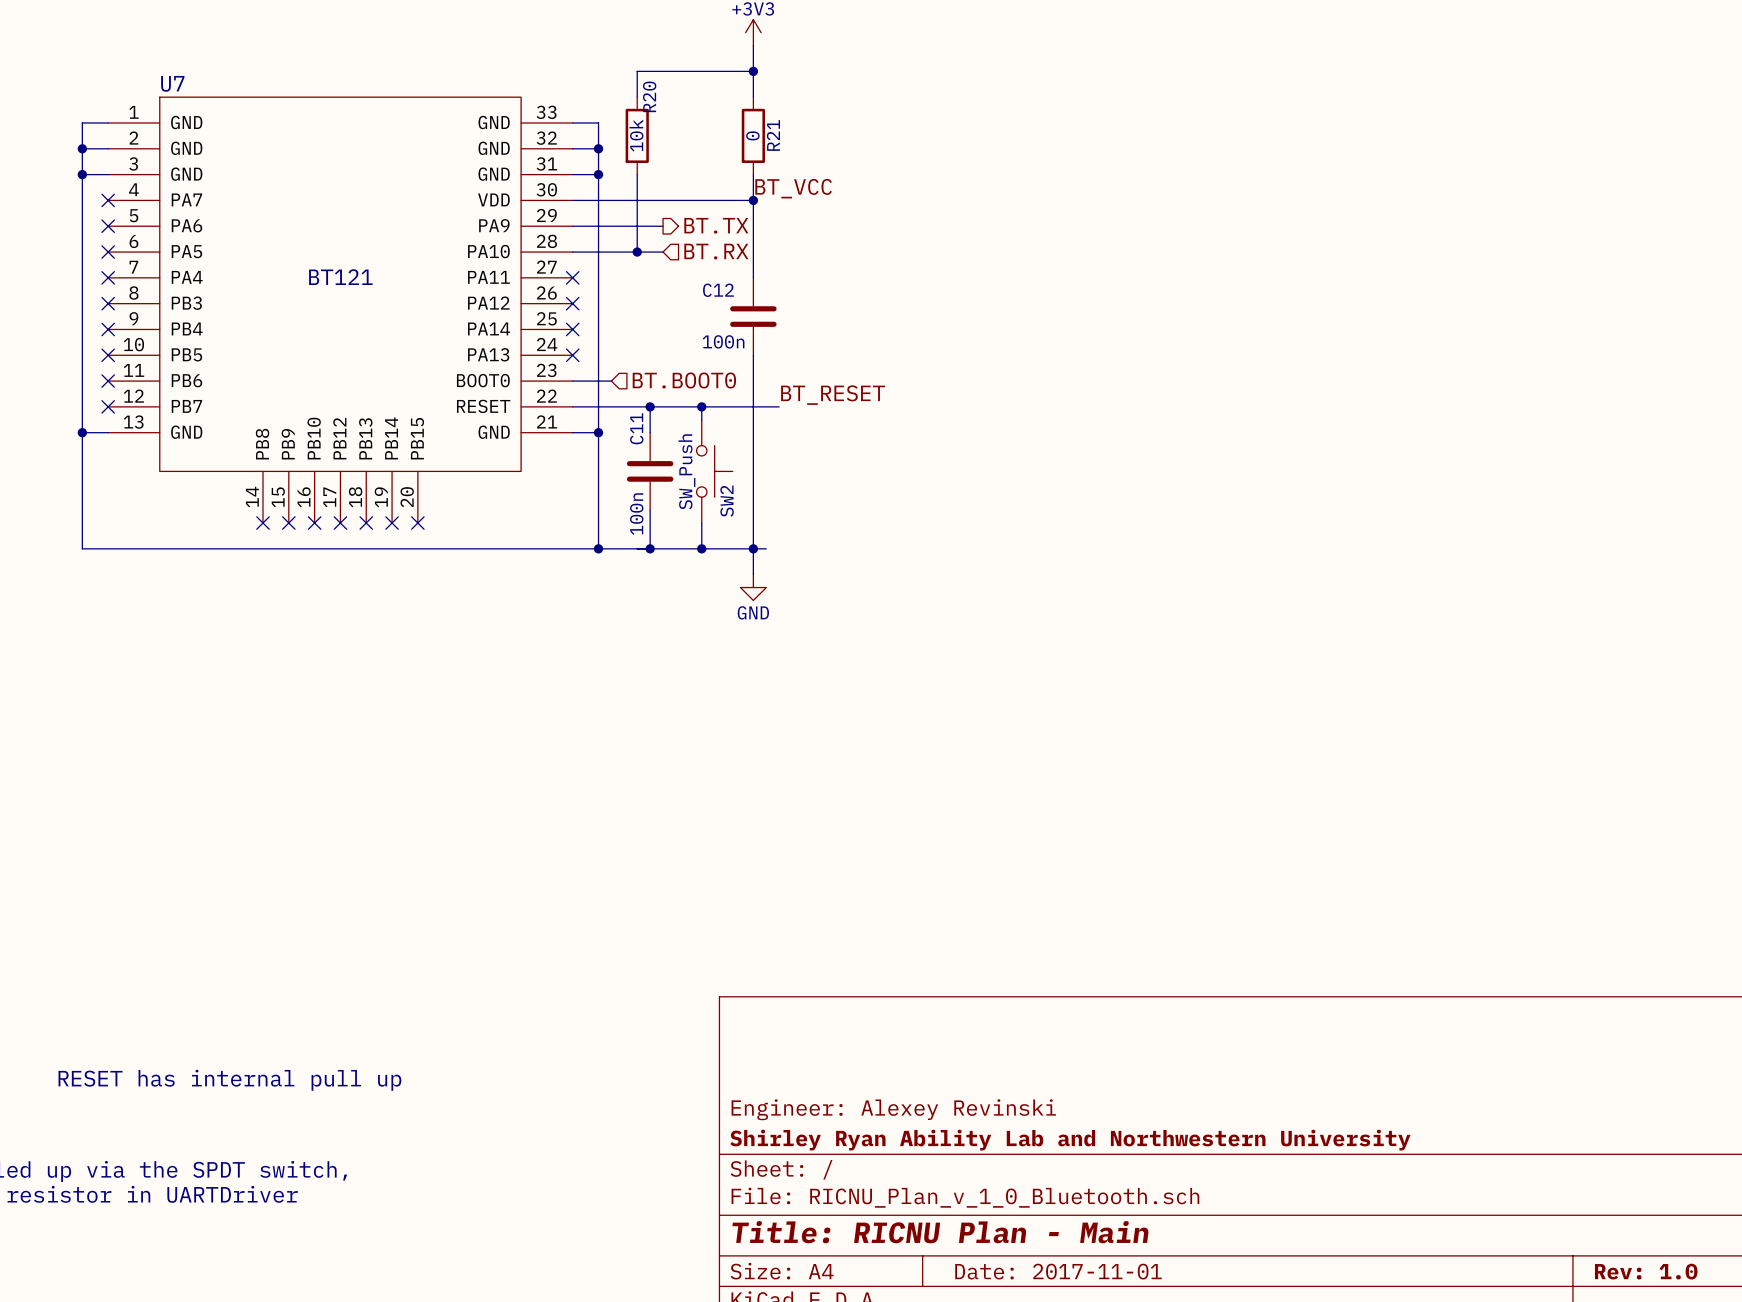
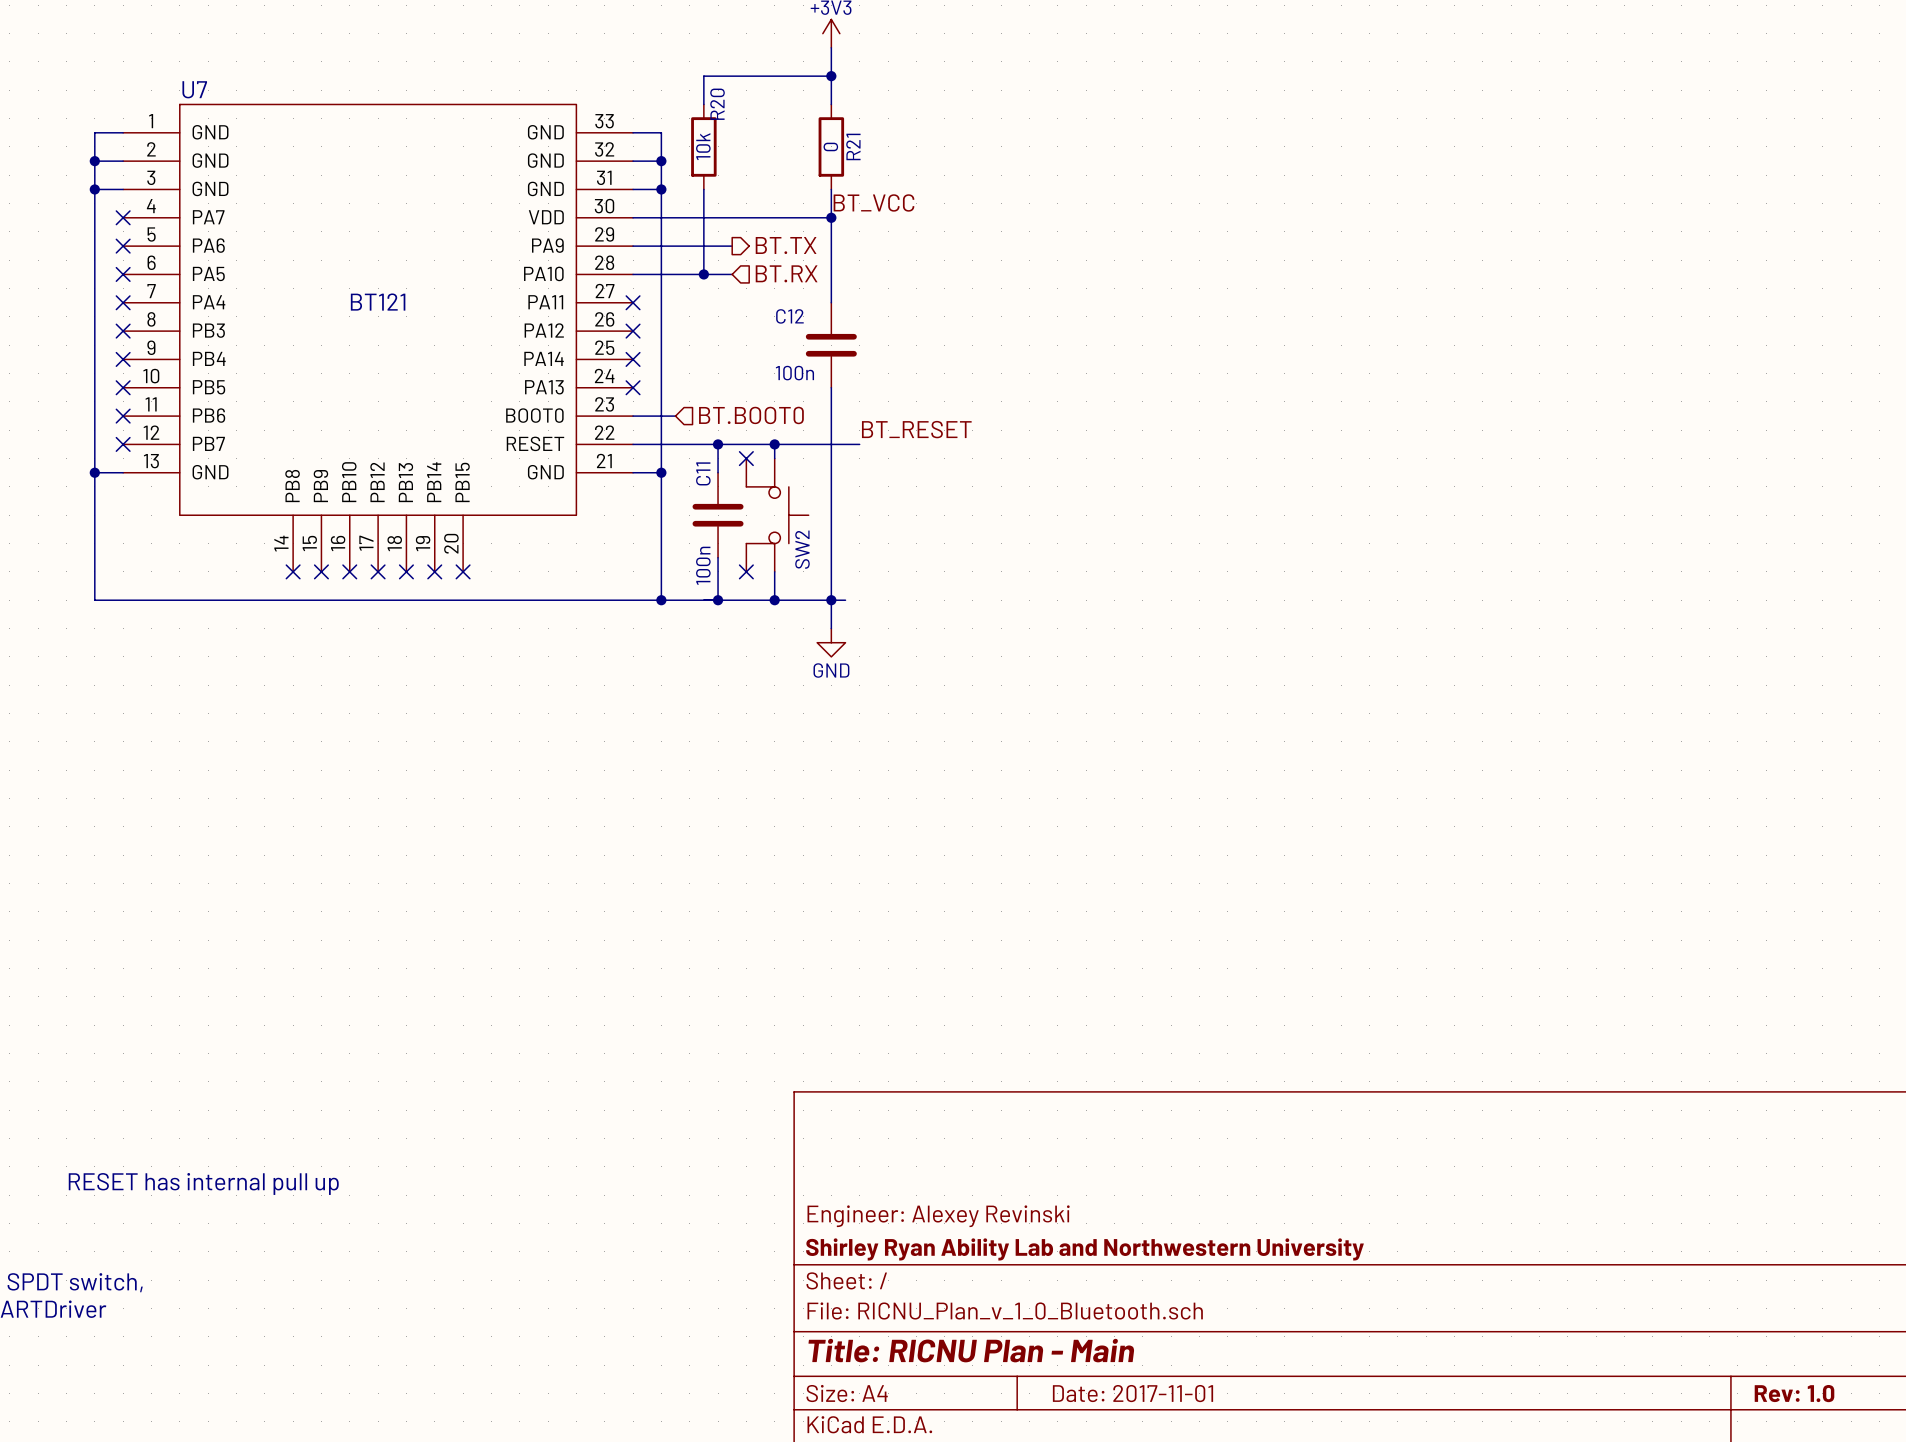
no-connect mark: none -> (746, 458)
SW2 symbol: [696, 419, 733, 524] -> [746, 458, 809, 572]
SW2 value: SW_Push (686, 471) -> none
no-connect mark: none -> (746, 571)

